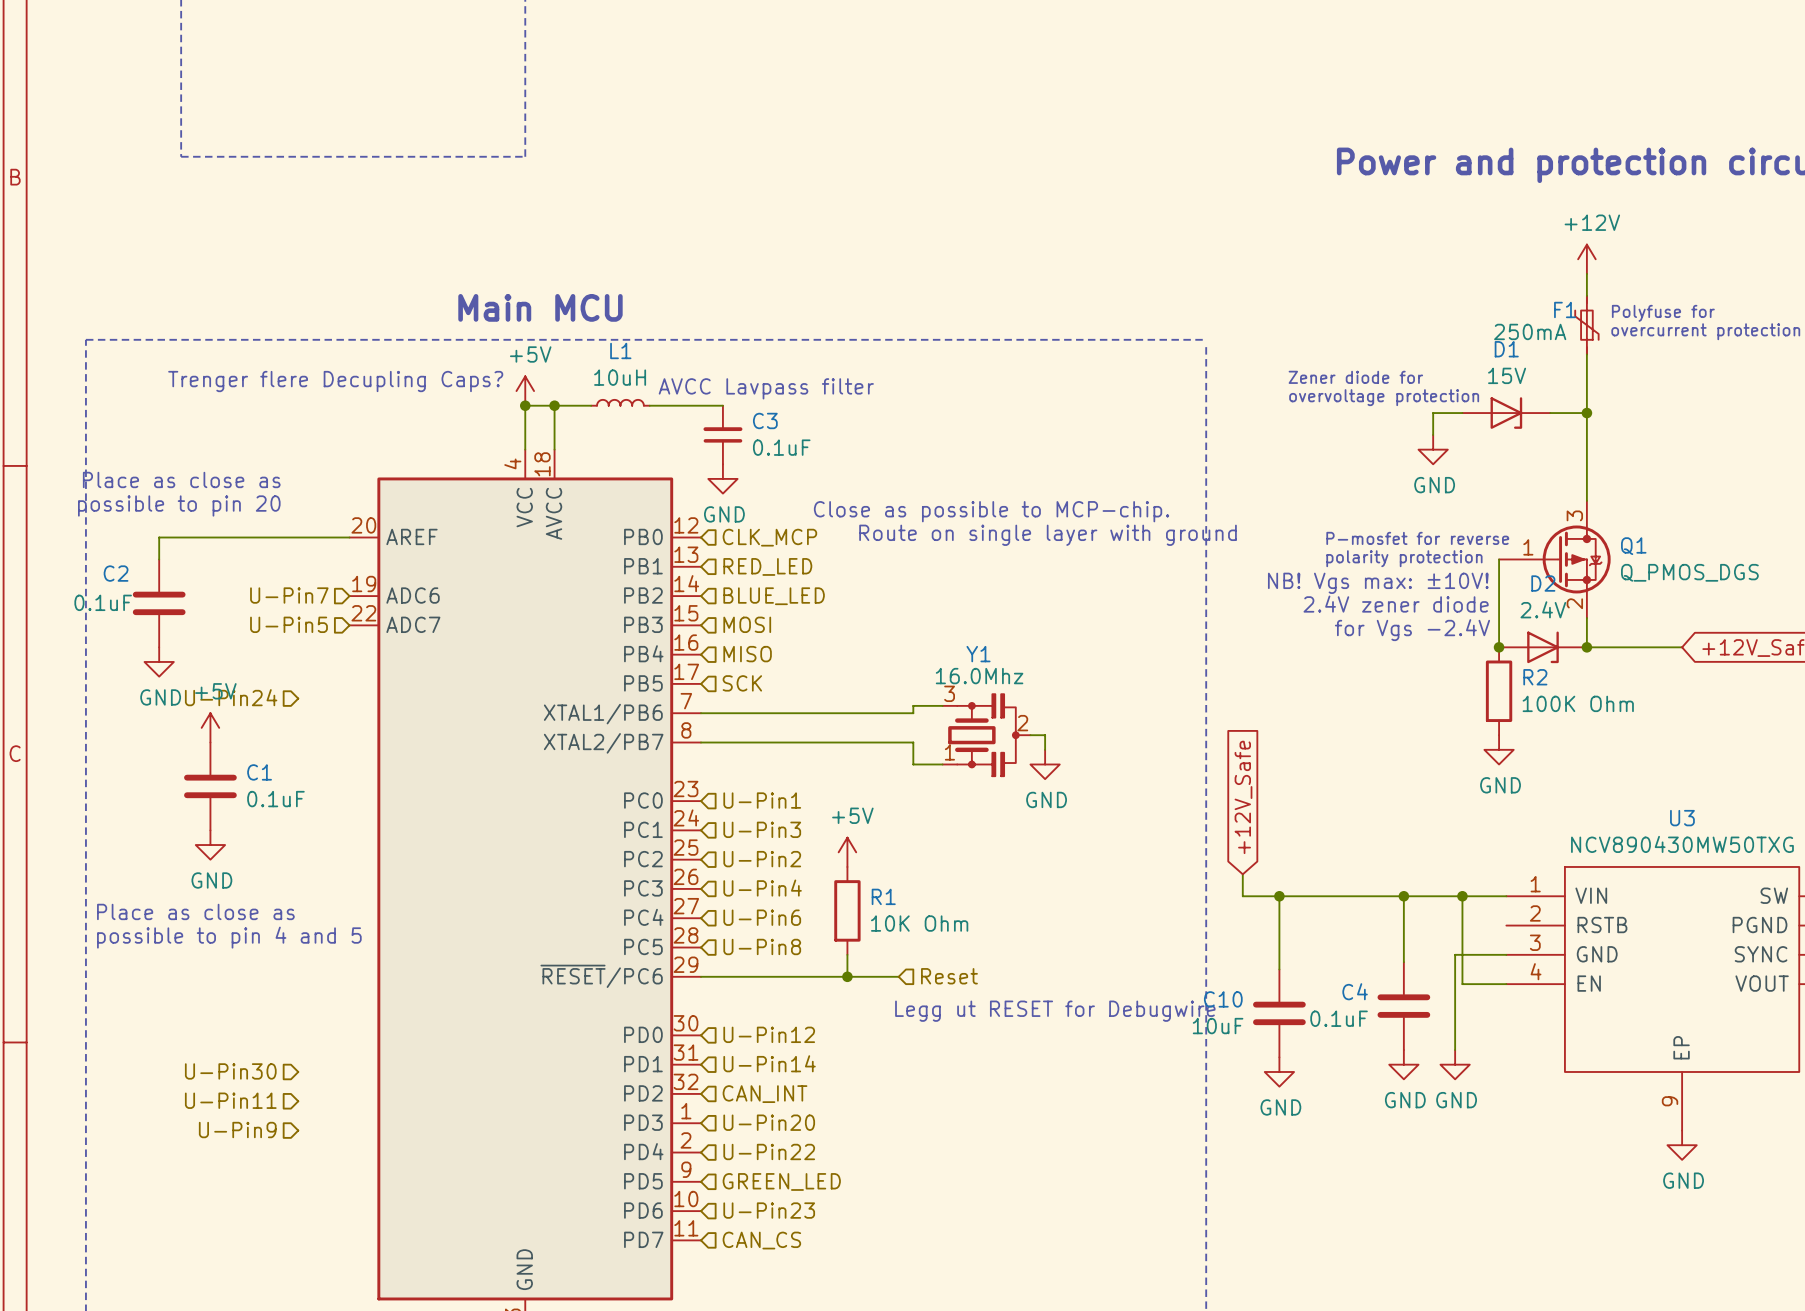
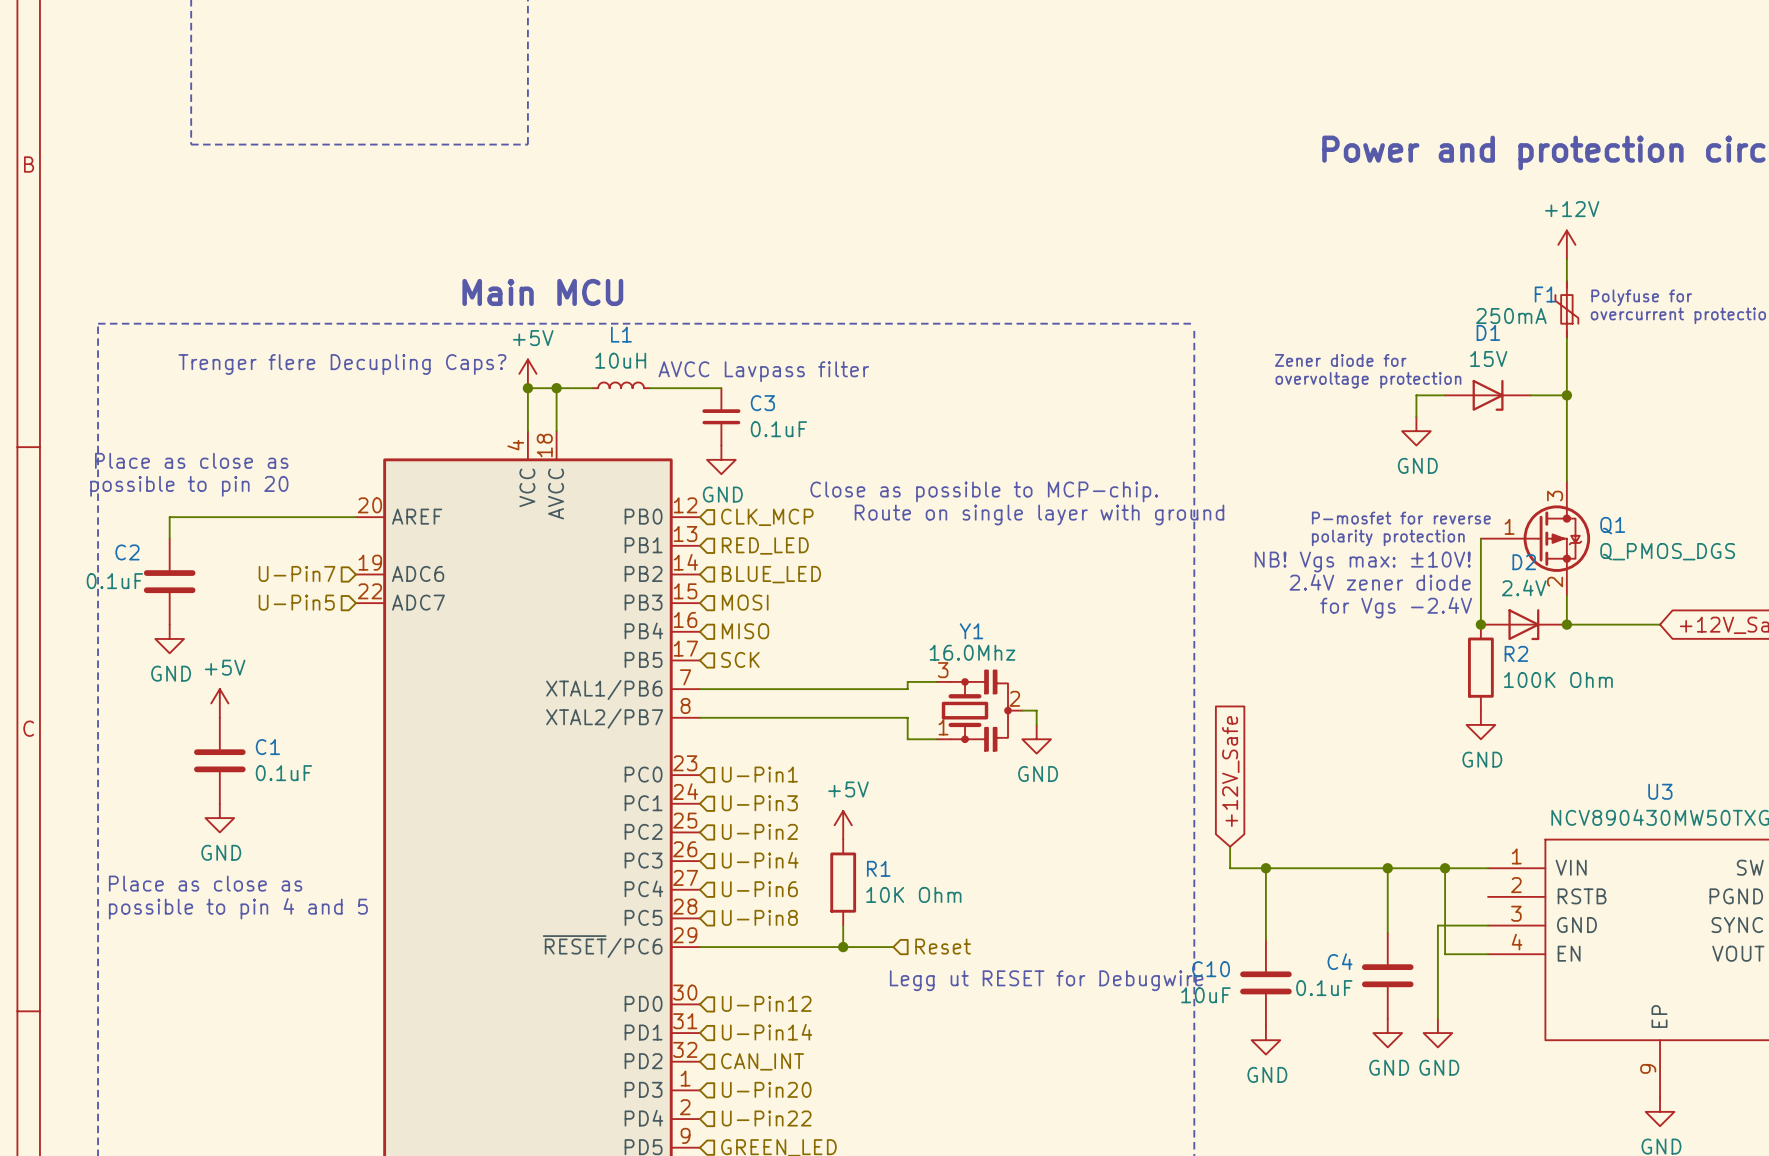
hierarchical label: U-Pin24 (231, 697) -> none
hierarchical label: U-Pin30 (230, 1071) -> none
hierarchical label: U-Pin11 (230, 1100) -> none
hierarchical label: U-Pin9 (237, 1130) -> none

